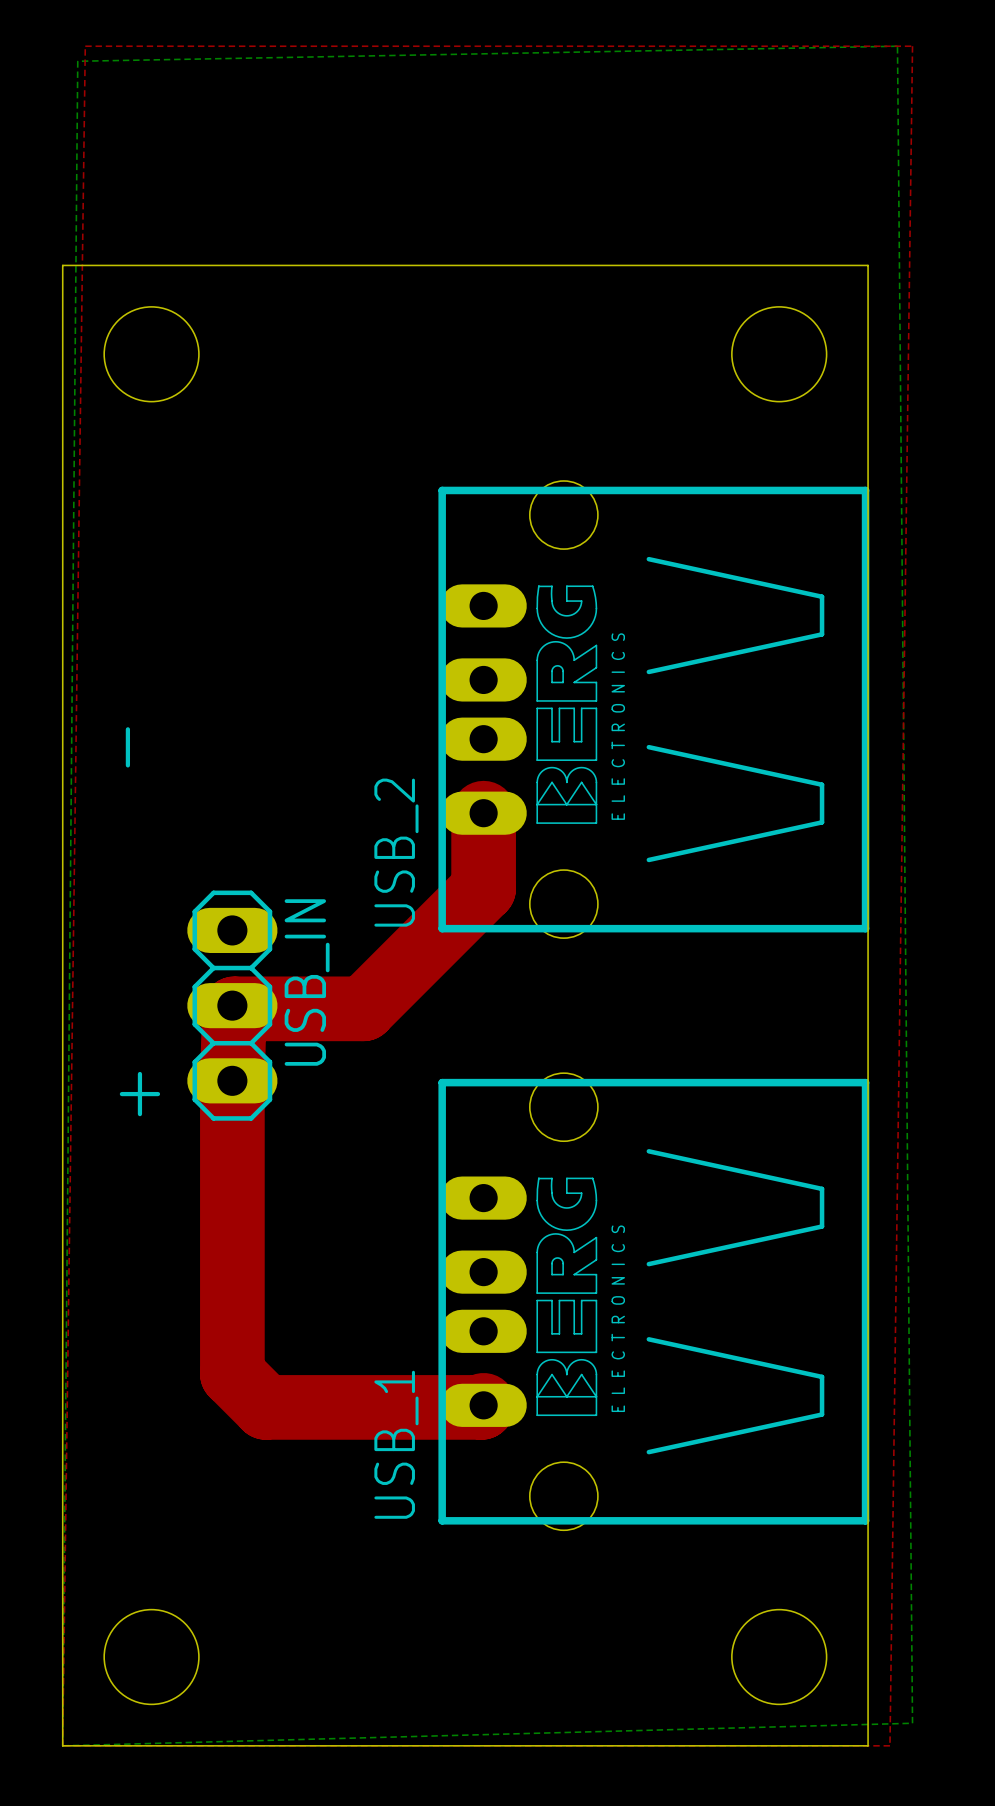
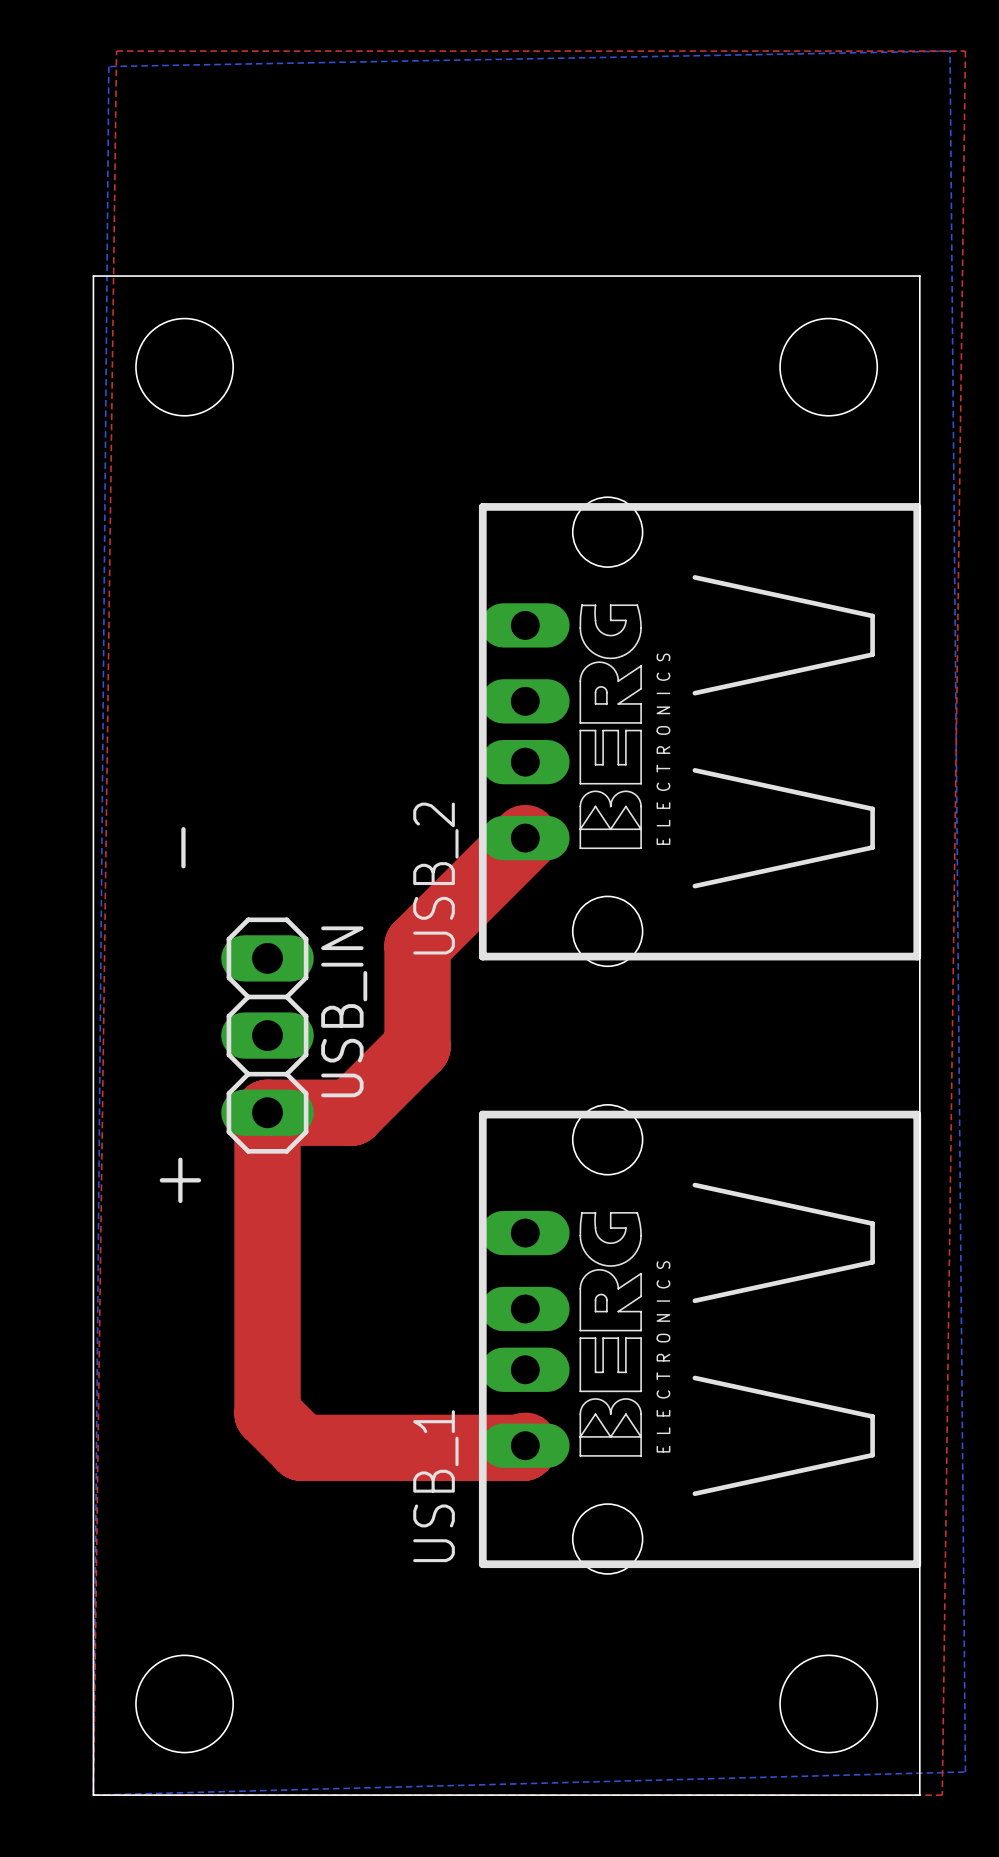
text position: _ (127, 747) -> _ (183, 847)
top track: (483, 813) (483, 888) (363, 1008) (234, 1008) (232, 1080) -> (525, 838) (417, 945) (417, 1046) (351, 1112) (267, 1112)
text position: + (139, 1094) -> + (180, 1180)

